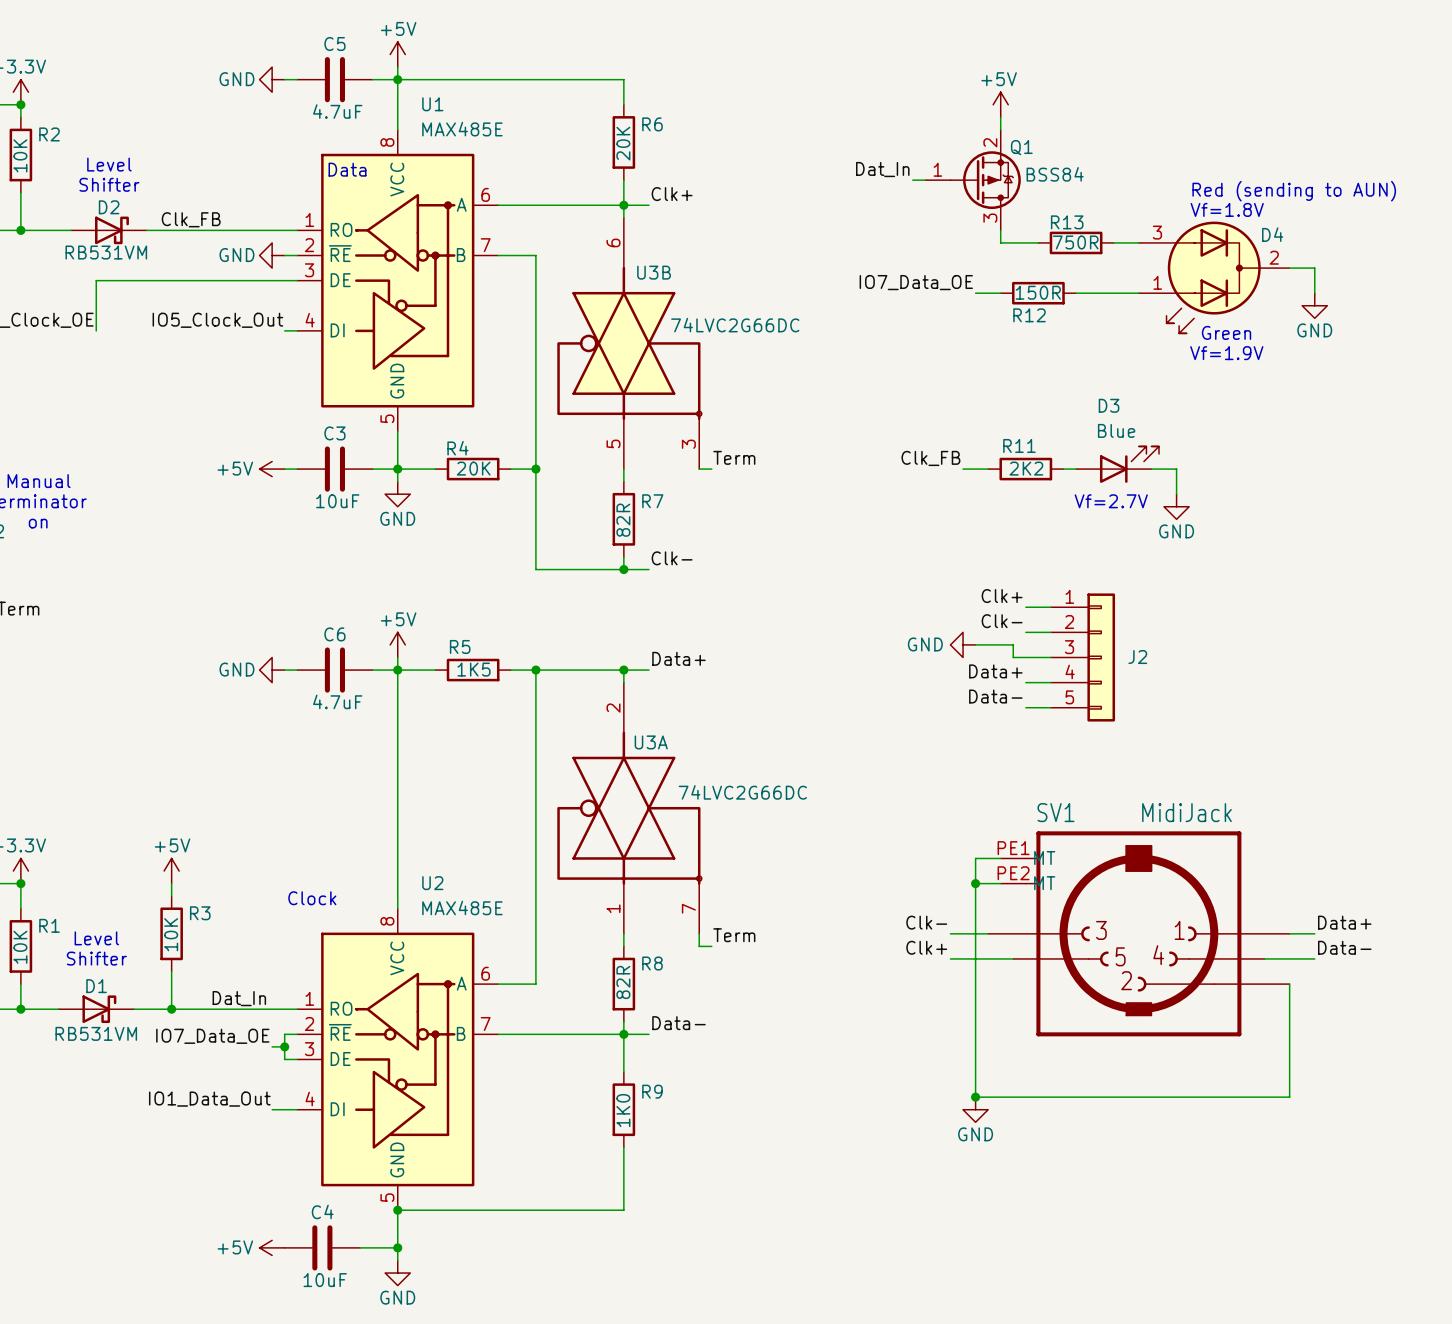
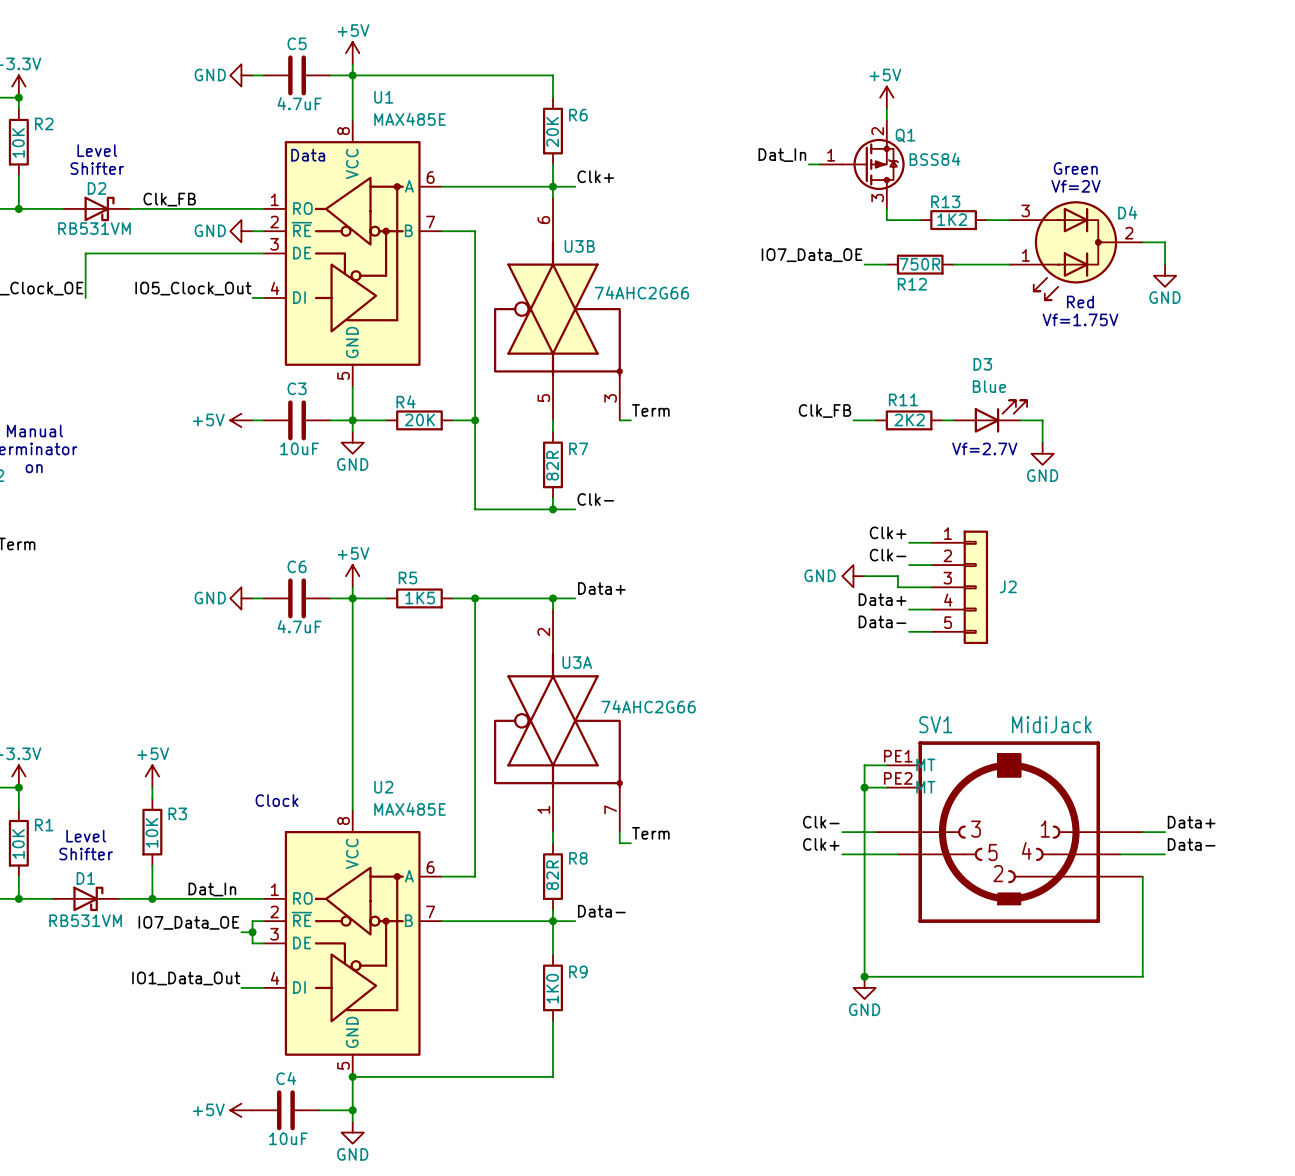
text: none -> Green (1075, 168)
text: Red (sending to AUN) (1294, 191) -> none
text: Vf=1.8V (1227, 209) -> Vf=2V (1076, 186)
R13 value: 750R (1075, 242) -> 1K2 (952, 219)
R12 value: 150R (1038, 292) -> 750R (919, 264)
U3B value: 74LVC2G66DC (735, 325) -> 74AHC2G66 (641, 292)
text: Green (1226, 332) -> Red (1080, 302)
text: Vf=1.9V (1226, 353) -> Vf=1.75V (1080, 319)
U3A value: 74LVC2G66DC (742, 792) -> 74AHC2G66 (648, 706)

